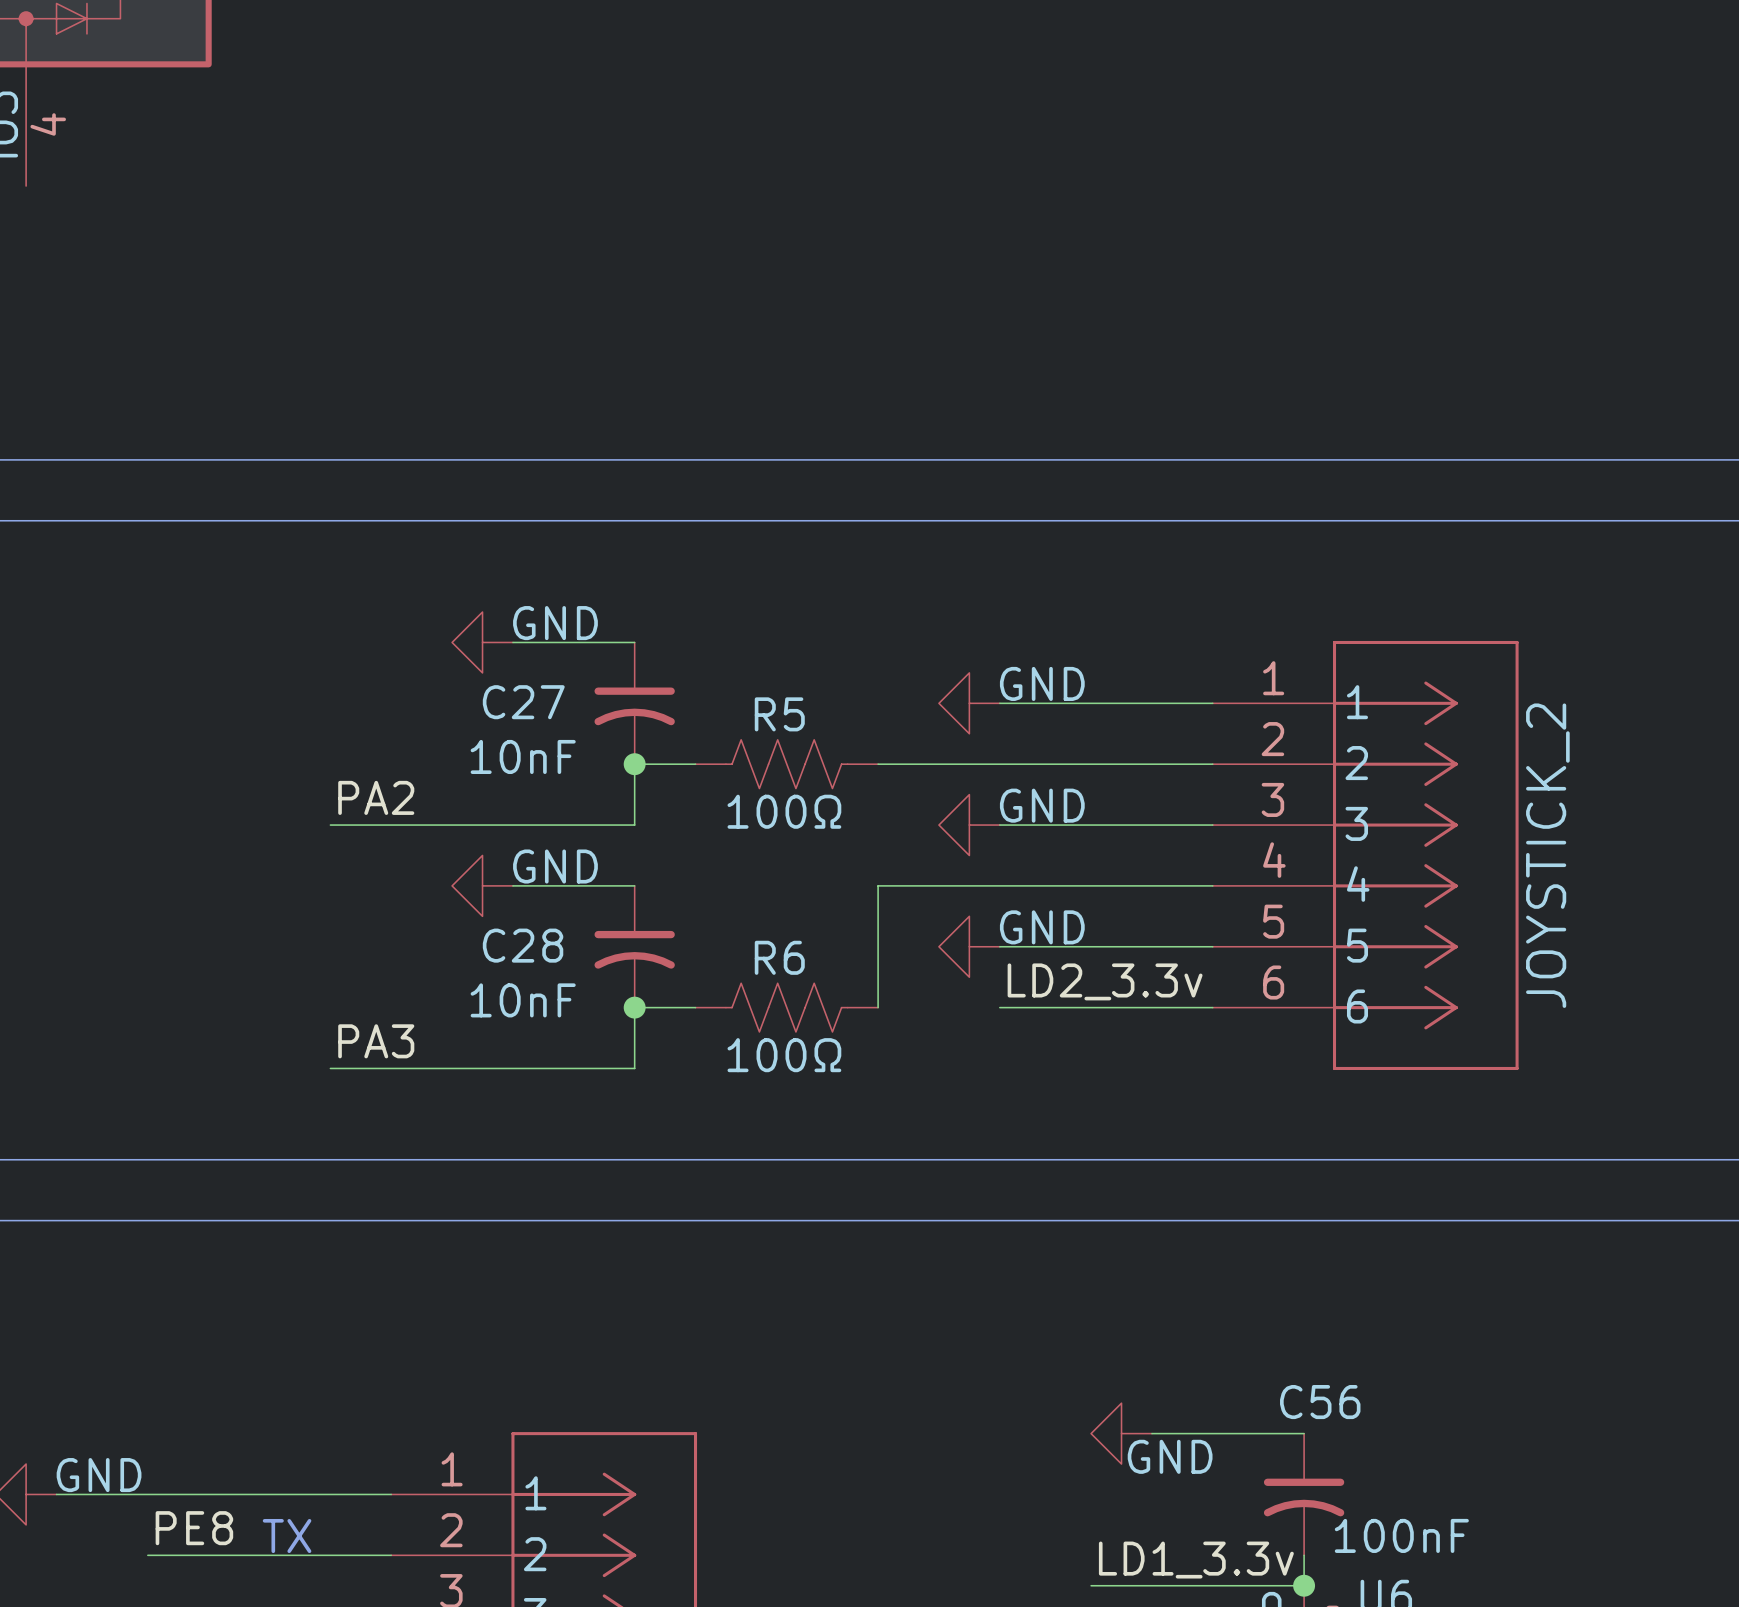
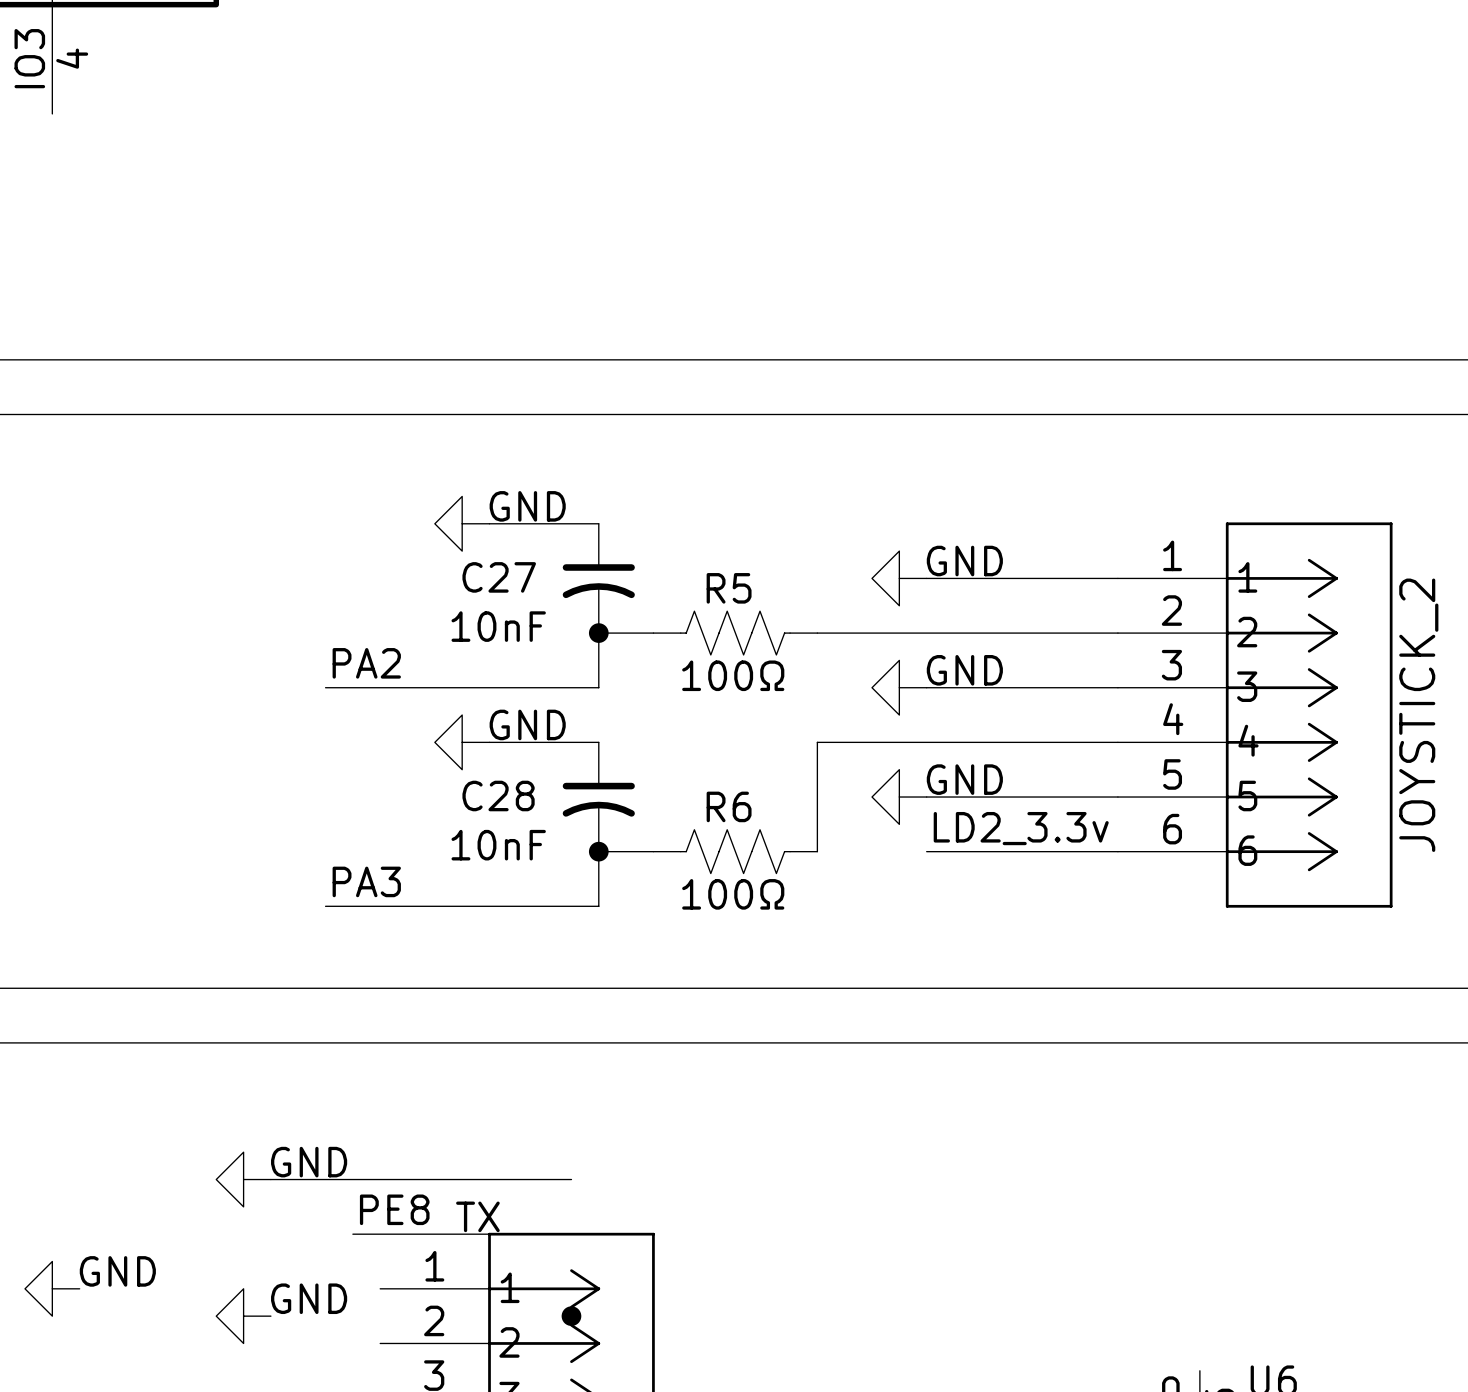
power symbol: none -> GND (243, 1179)
power symbol: GND (1121, 1433) -> none
wire: (1151, 1433) (1304, 1433) -> none
wire: (56, 1494) (391, 1494) -> (270, 1179) (571, 1179)
C56: 100nF (1304, 1494) -> none
power symbol: none -> GND (243, 1316)
junction: none -> (571, 1316)
label position: PE8 (194, 1528) -> PE8 (394, 1209)
text position: TX (287, 1536) -> TX (477, 1216)
wire: (147, 1555) (391, 1555) -> (352, 1234) (571, 1234)
wire: (1304, 1555) (1304, 1585) (1091, 1585) -> none
label: LD1_3.3v (1196, 1560) -> none
junction: (1304, 1585) -> none

